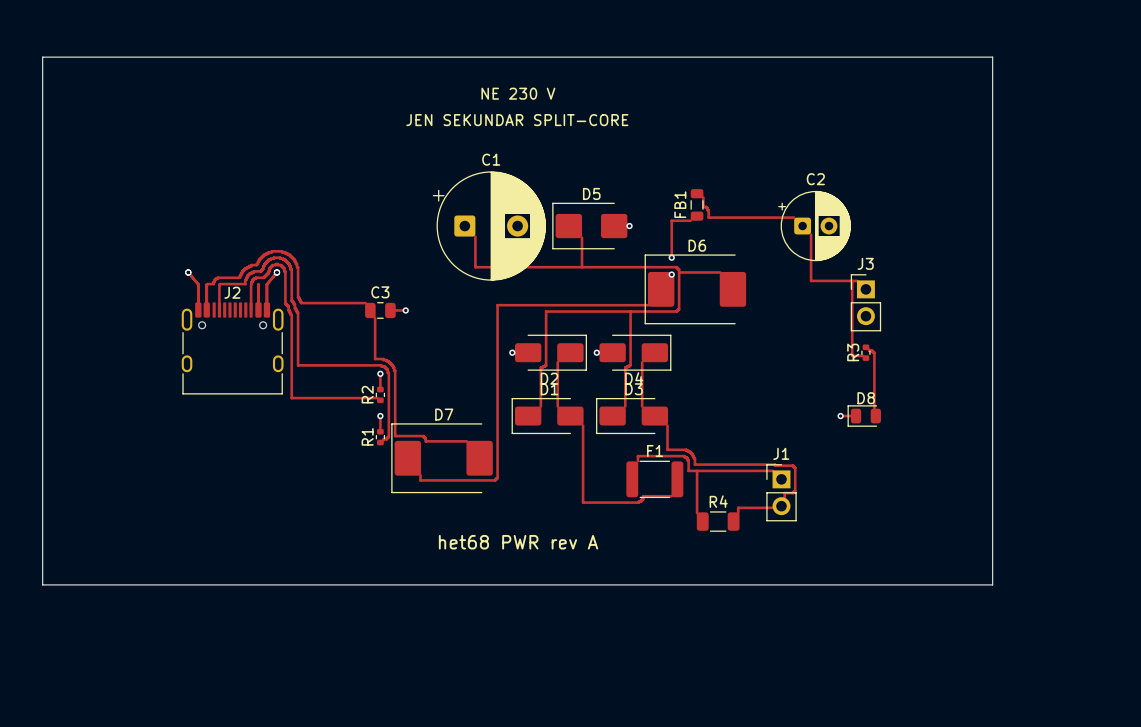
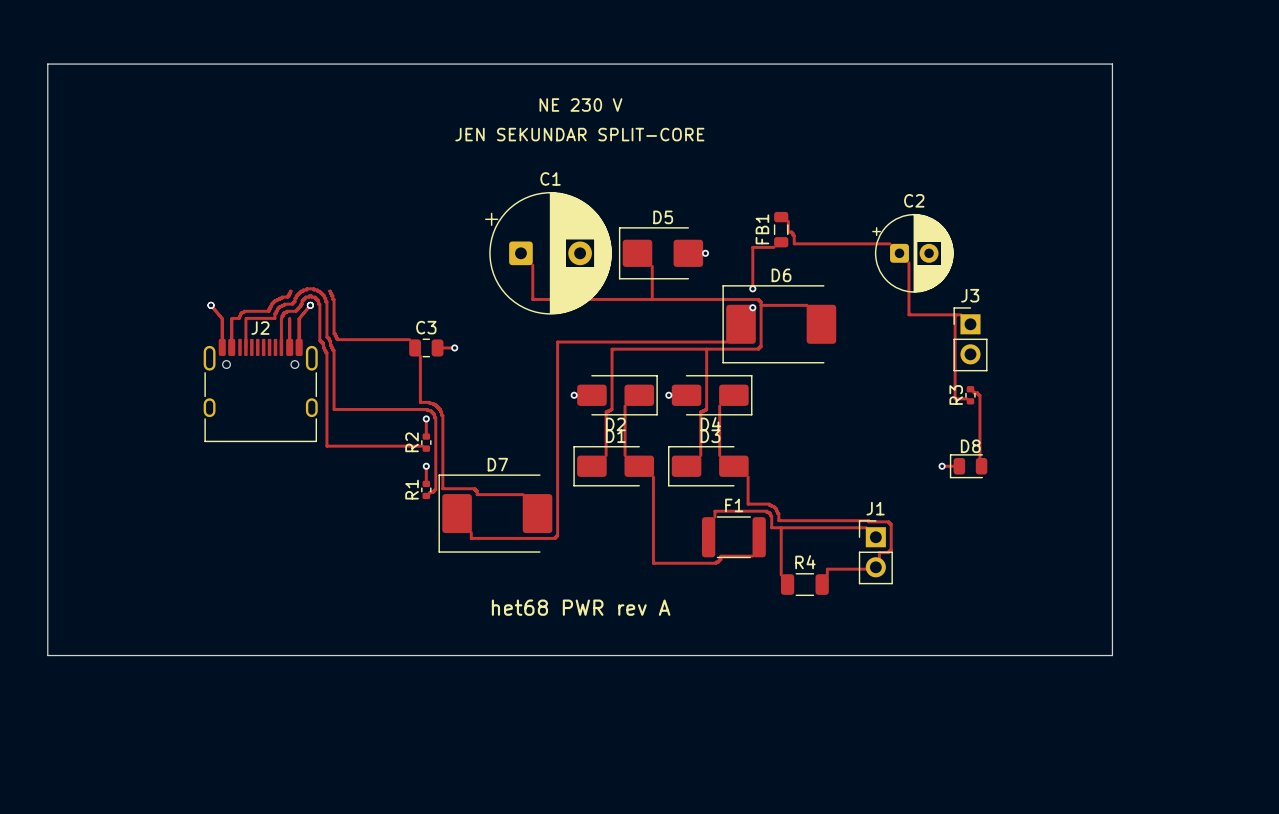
track: (260, 259) (264, 254) (271, 251) (285, 252) (293, 259) -> none

